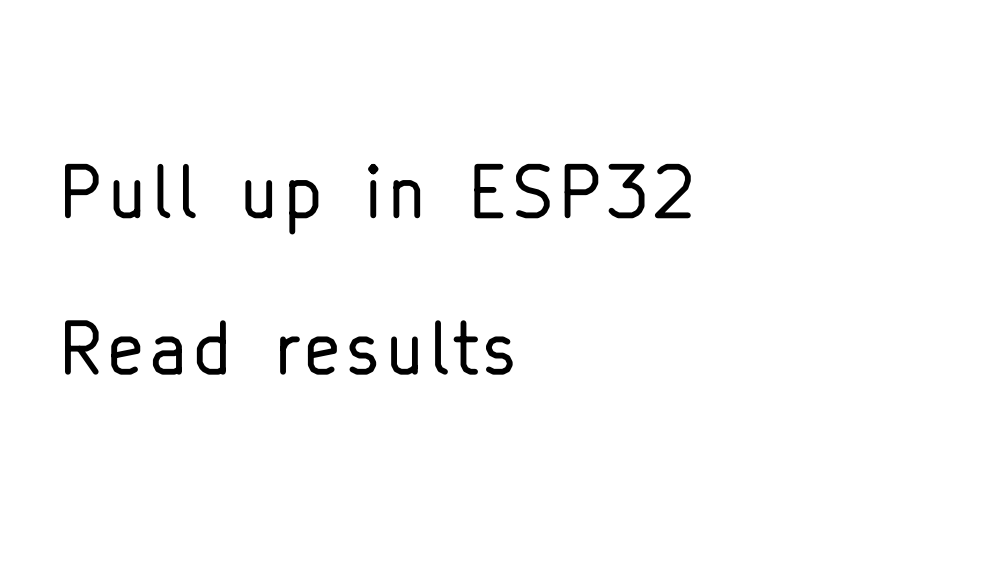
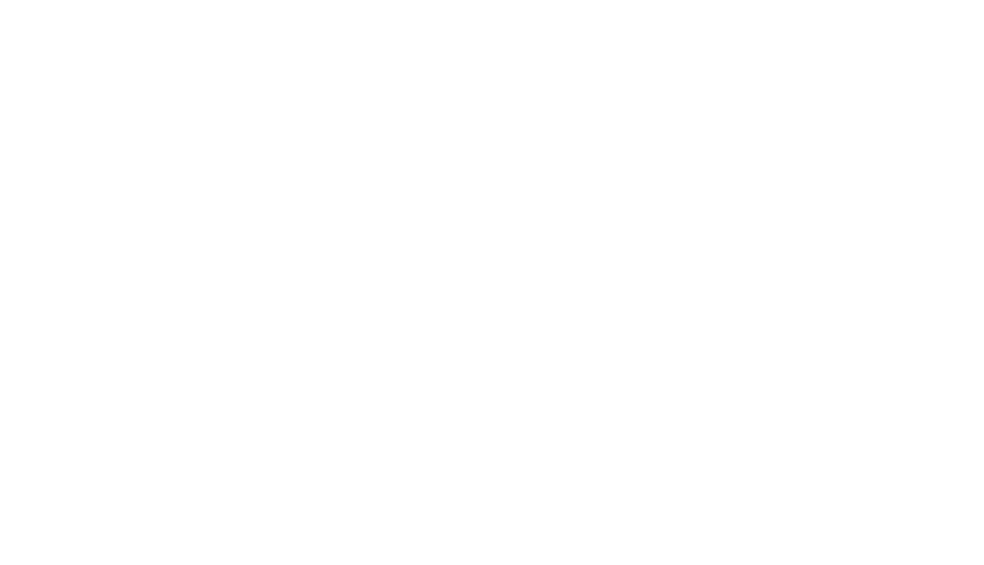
text: Pull up in ESP32 (377, 199) -> none
text: Read results (288, 347) -> none

